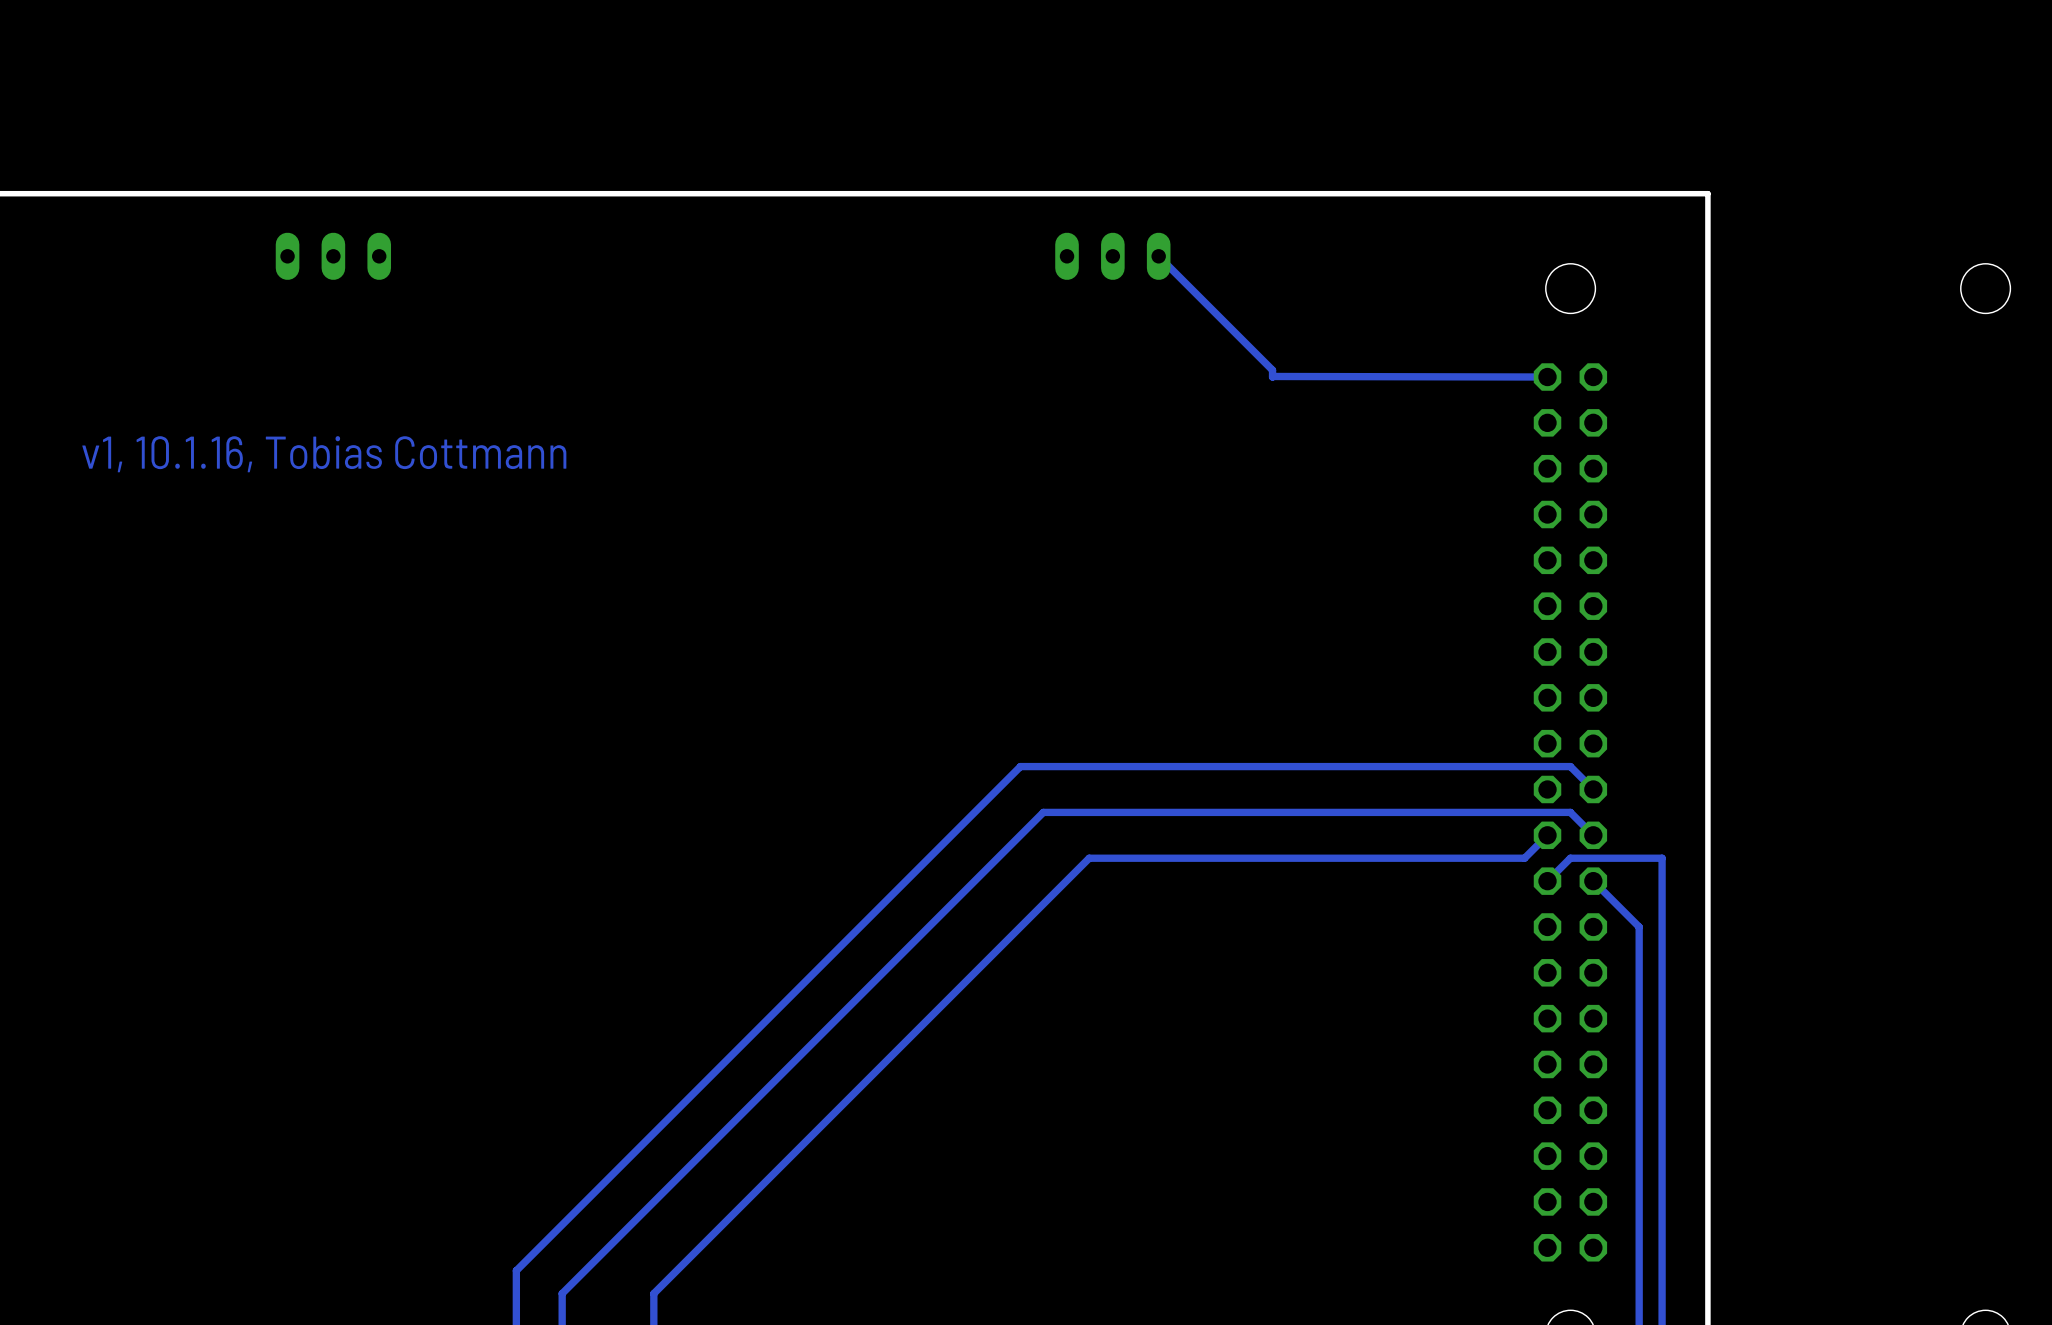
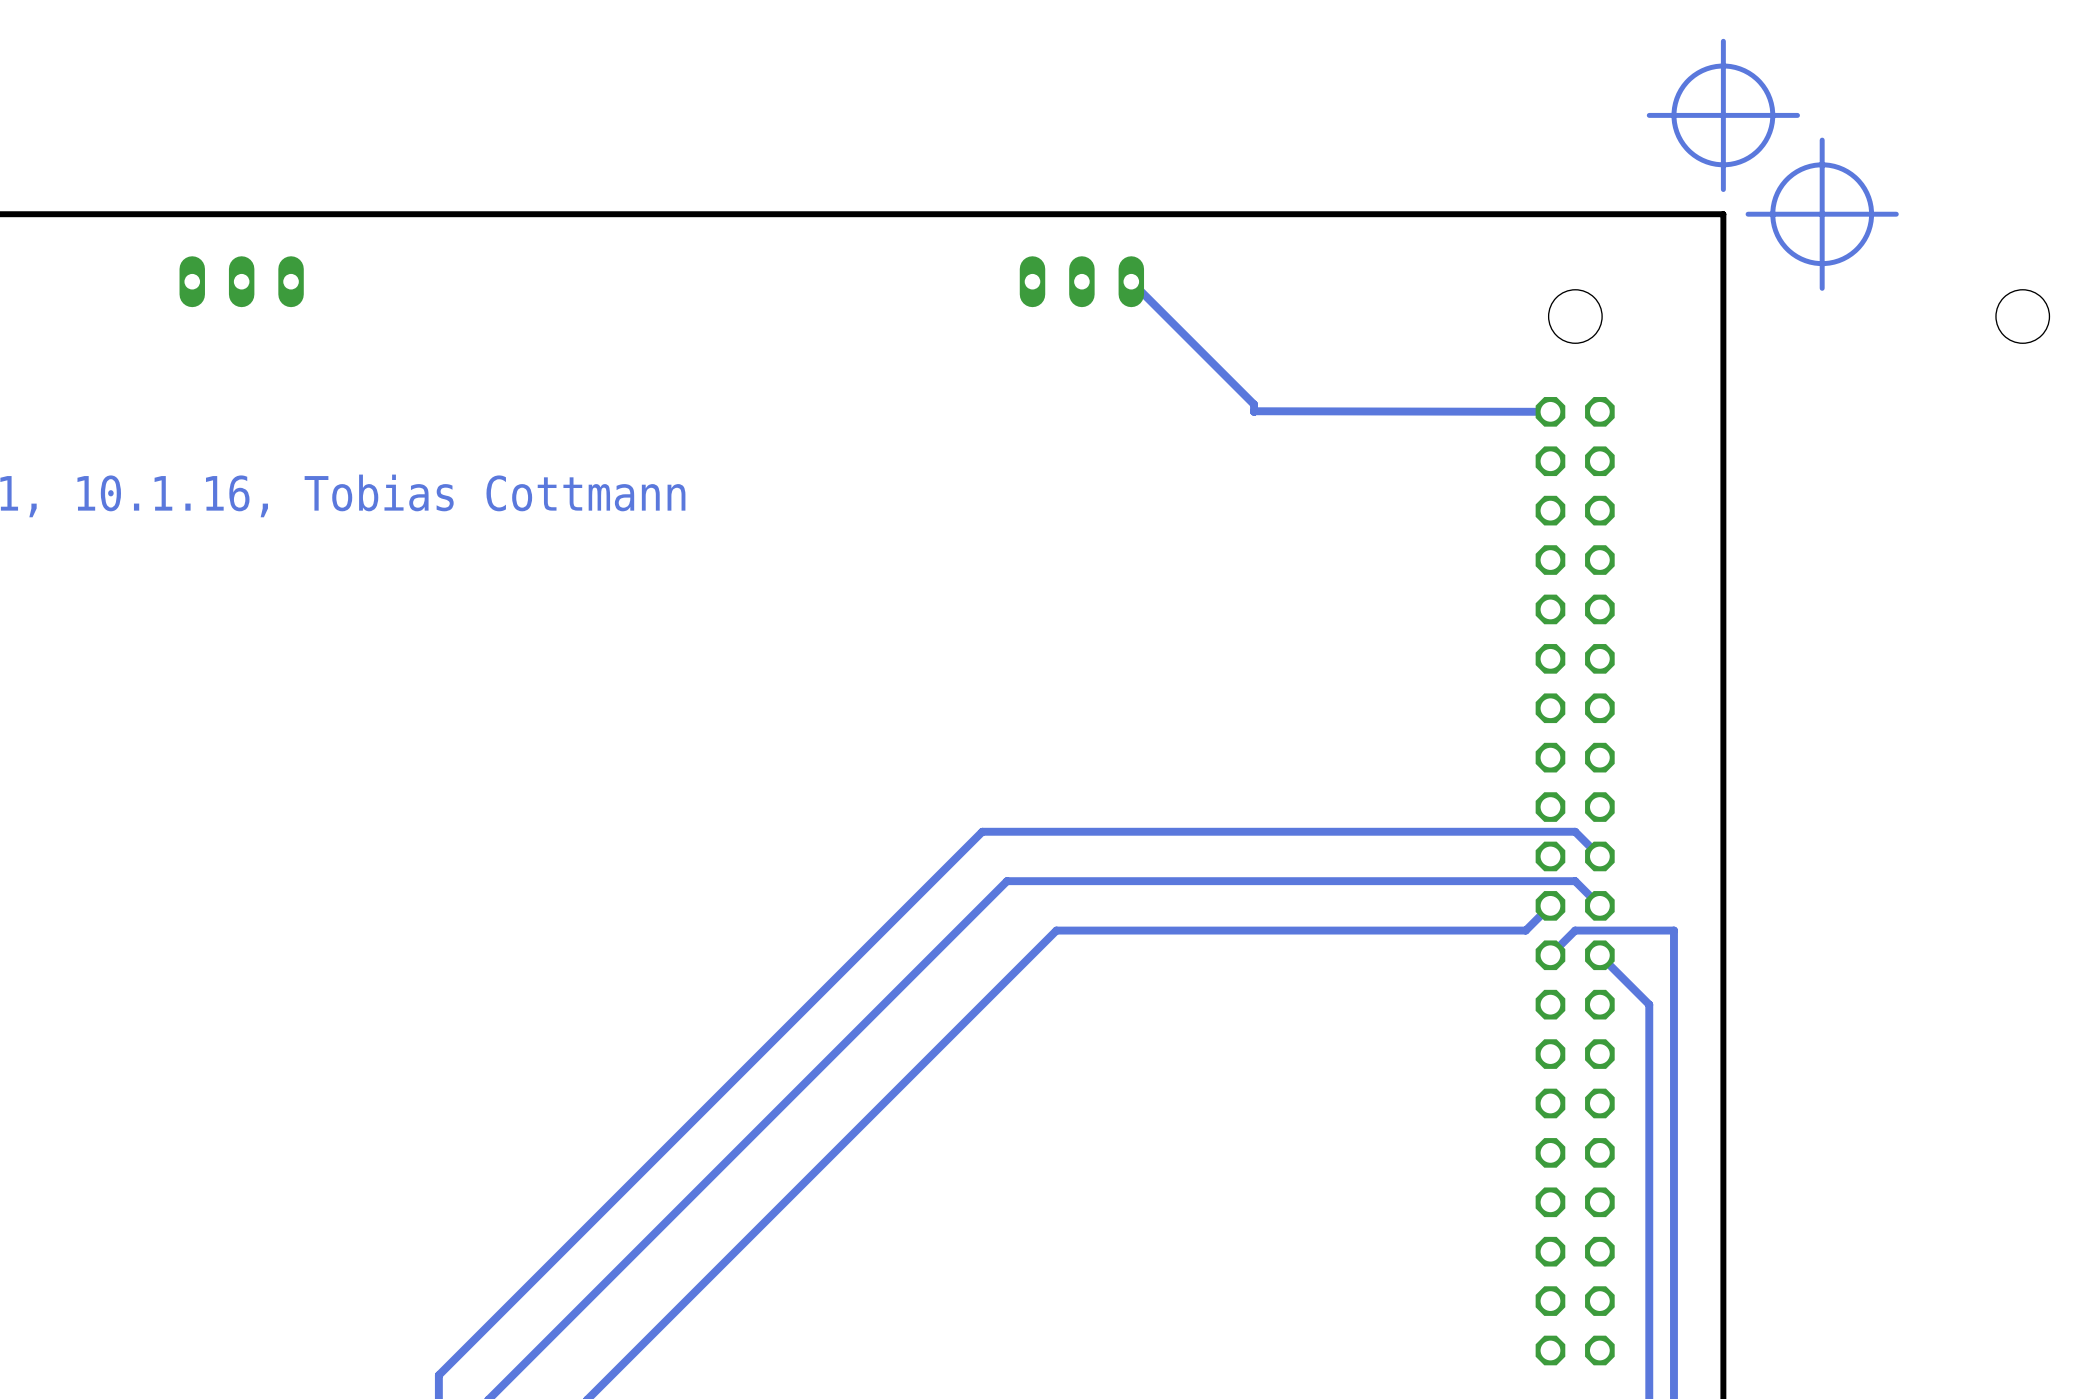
track: none -> (1723, 41) (1723, 189)
drawing: none -> [1671, 63, 1875, 267]
track: none -> (1797, 115) (1649, 115)
track: none -> (1822, 140) (1822, 288)
track: none -> (1896, 214) (1748, 214)

